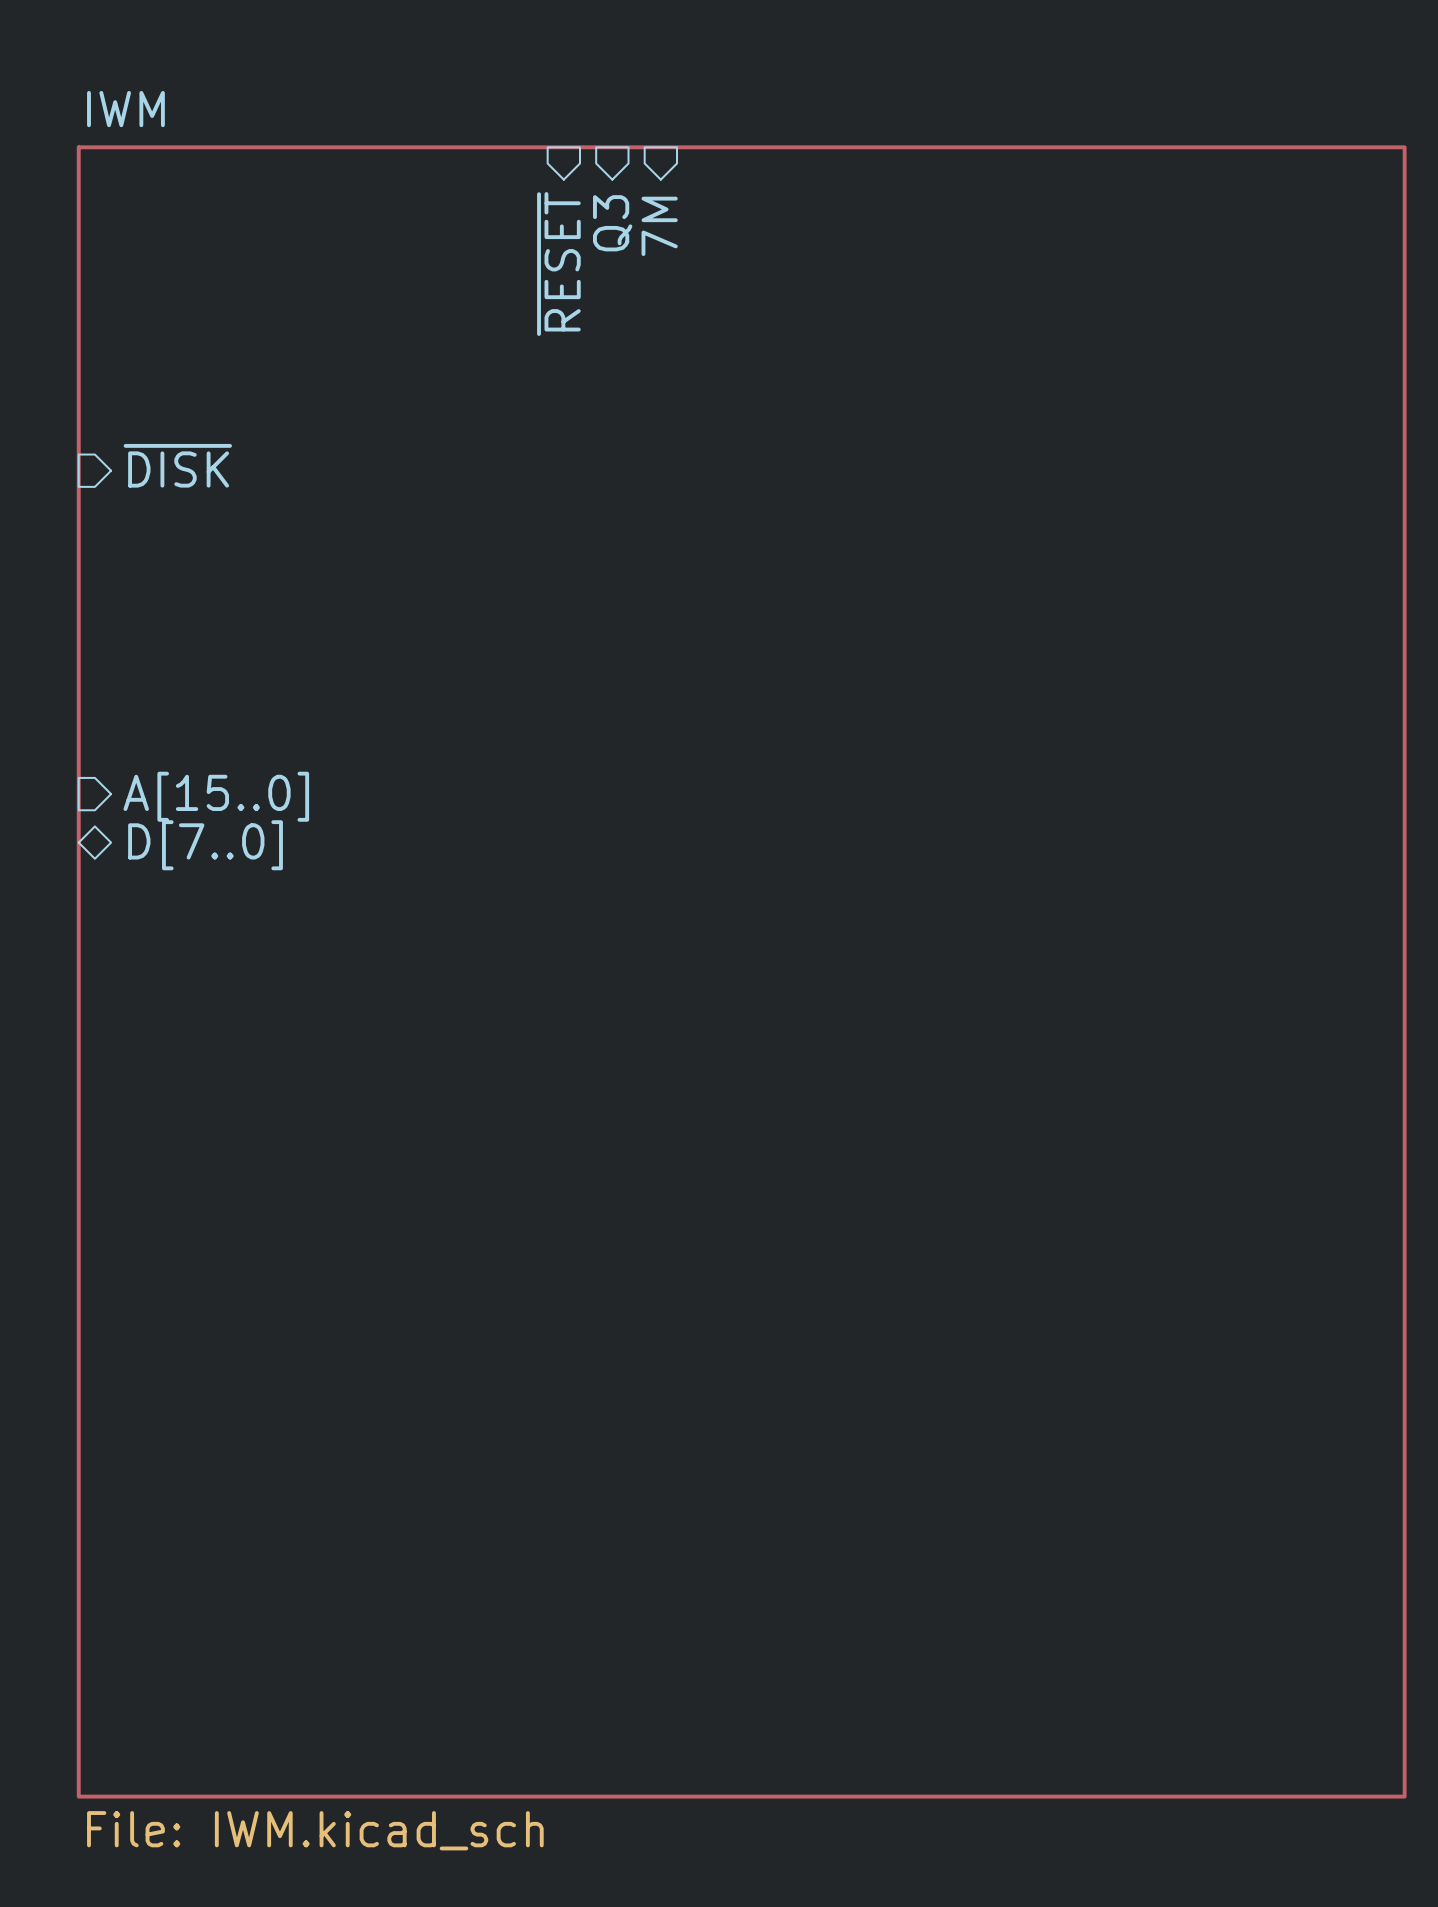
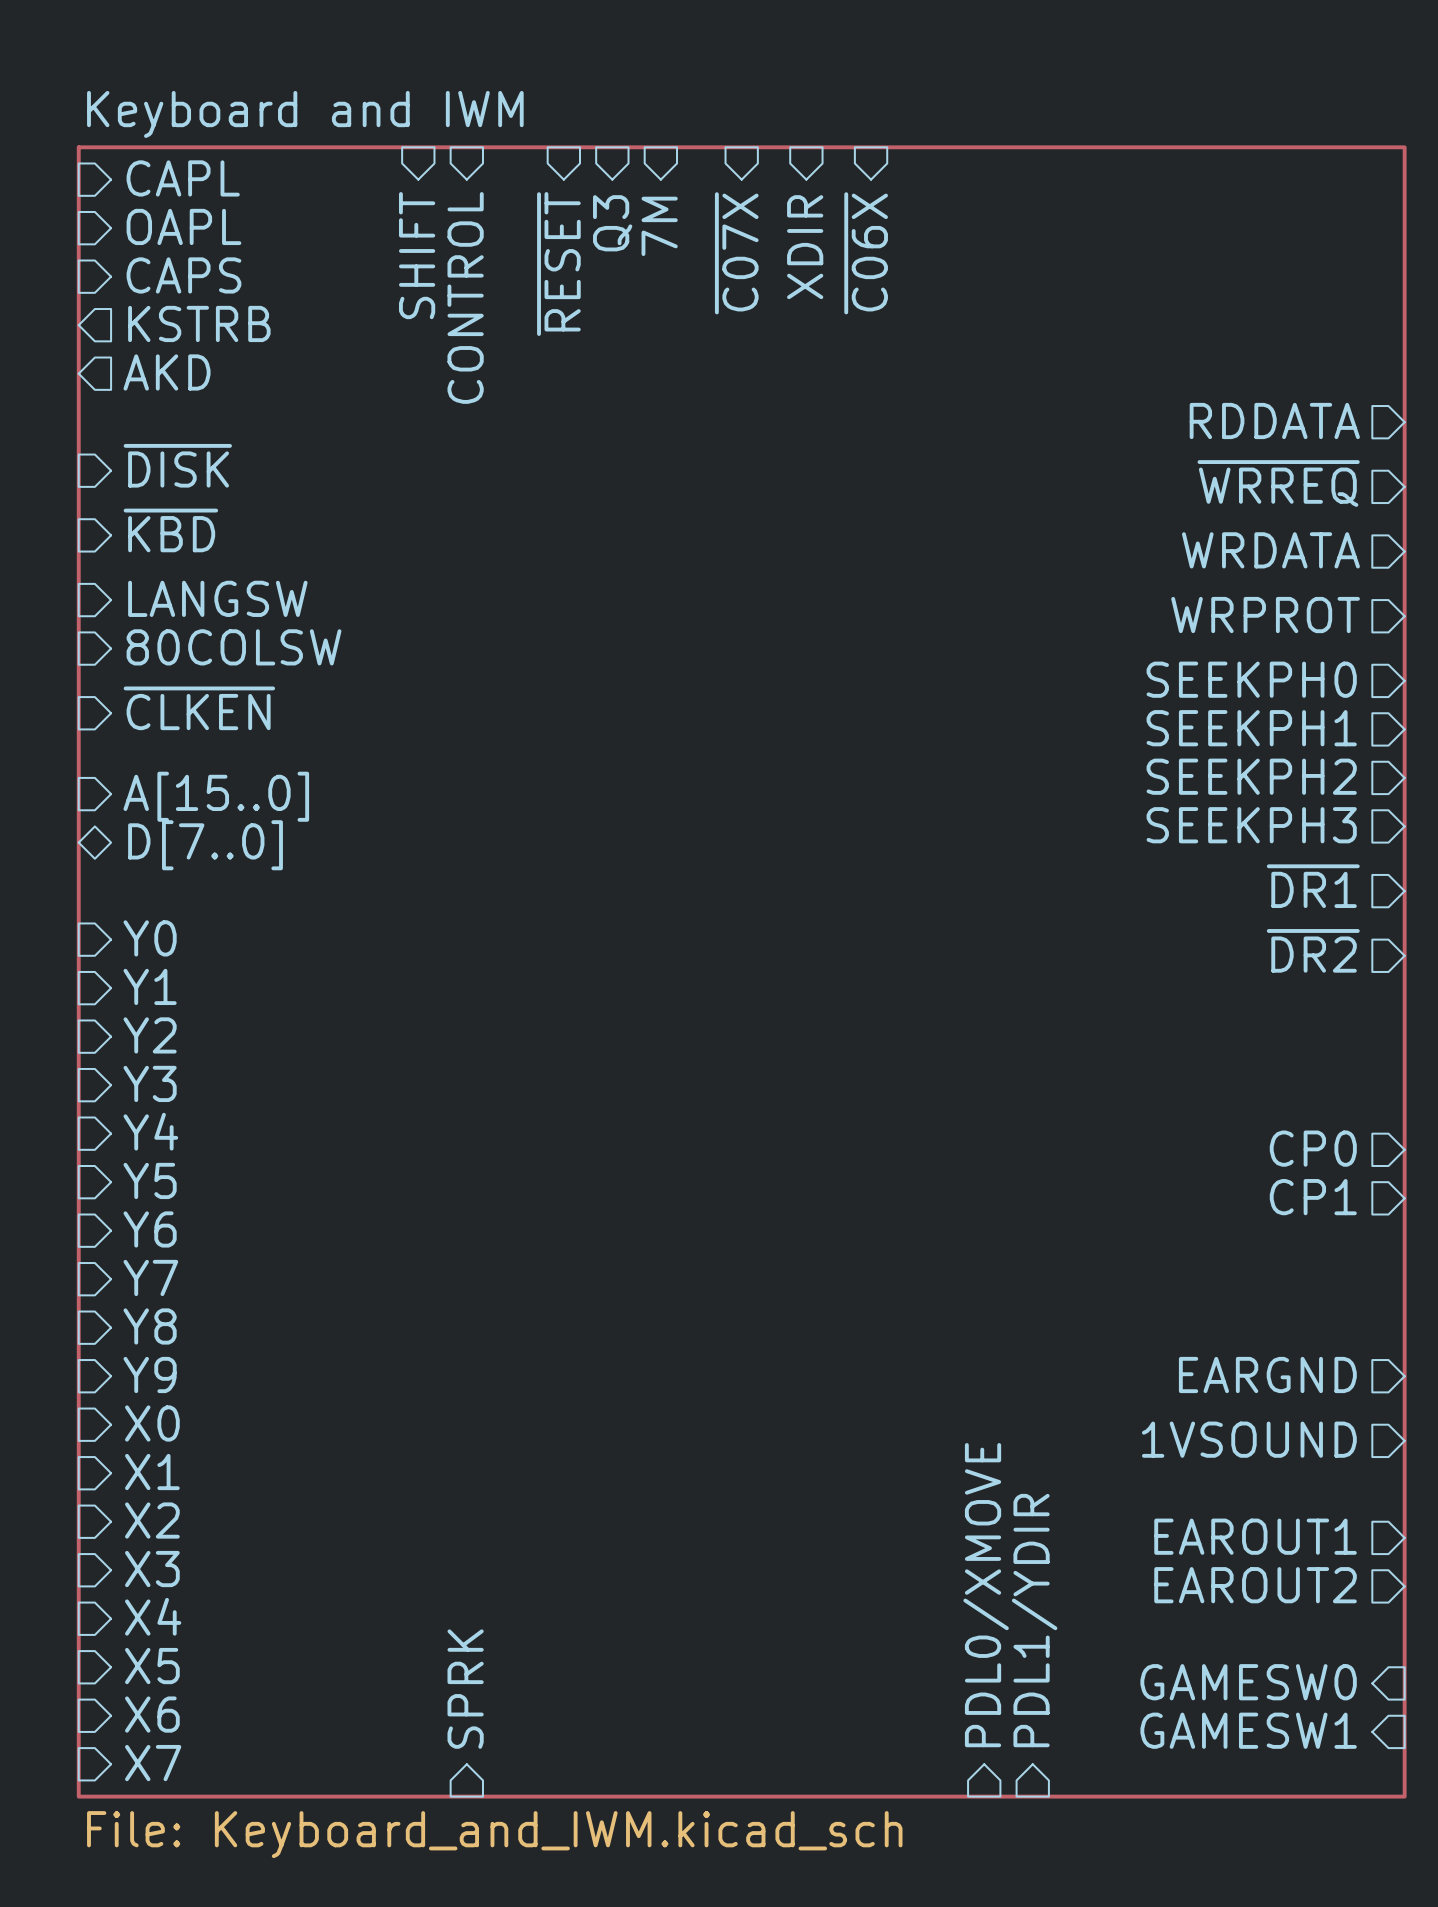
sheet IWM name: IWM (125, 109) -> Keyboard and IWM (305, 114)
sheet pin: none -> CAPL (183, 178)
sheet pin: none -> OAPL (183, 226)
sheet pin: none -> XDIR (805, 247)
sheet pin: none -> ~{C07X} (736, 253)
sheet pin: none -> ~{C06X} (866, 253)
sheet pin: none -> SHIFT (417, 255)
sheet pin: none -> CAPS (183, 275)
sheet pin: none -> CONTROL (465, 297)
sheet pin: none -> KSTRB (199, 323)
sheet pin: none -> AKD (167, 372)
sheet pin: none -> RDDATA (1274, 420)
sheet pin: none -> ~{WRREQ} (1278, 483)
sheet pin: none -> ~{KBD} (170, 530)
sheet pin: none -> WRDATA (1270, 550)
sheet pin: none -> LANGSW (217, 598)
sheet pin: none -> WRPROT (1265, 615)
sheet pin: none -> 80COLSW (234, 647)
sheet pin: none -> SEEKPH0 (1251, 679)
sheet pin: none -> ~{CLKEN} (199, 708)
sheet pin: none -> SEEKPH1 (1251, 728)
sheet pin: none -> SEEKPH2 (1251, 776)
sheet pin: none -> SEEKPH3 (1251, 825)
sheet pin: none -> ~{DR1} (1313, 886)
sheet pin: none -> Y0 (150, 938)
sheet pin: none -> ~{DR2} (1313, 950)
sheet pin: none -> Y1 (150, 986)
sheet pin: none -> Y2 (150, 1035)
sheet pin: none -> Y3 (150, 1083)
sheet pin: none -> Y4 (150, 1131)
sheet pin: none -> CP0 (1313, 1148)
sheet pin: none -> Y5 (150, 1180)
sheet pin: none -> CP1 (1313, 1197)
sheet pin: none -> Y6 (150, 1229)
sheet pin: none -> Y7 (150, 1277)
sheet pin: none -> Y8 (150, 1326)
sheet pin: none -> Y9 (150, 1374)
sheet pin: none -> EARGND (1267, 1374)
sheet pin: none -> X0 (152, 1423)
sheet pin: none -> 1VSOUND (1249, 1439)
sheet pin: none -> X1 (152, 1472)
sheet pin: none -> X2 (152, 1520)
sheet pin: none -> EAROUT1 (1255, 1536)
sheet pin: none -> X3 (152, 1569)
sheet pin: none -> EAROUT2 (1255, 1585)
sheet pin: none -> PDL0/XMOVE (986, 1595)
sheet pin: none -> X4 (153, 1616)
sheet pin: none -> PDL1/YDIR (1034, 1620)
sheet pin: none -> X5 (152, 1666)
sheet pin: none -> GAMESW0 (1248, 1682)
sheet pin: none -> SPRK (465, 1689)
sheet pin: none -> X6 (152, 1714)
sheet pin: none -> GAMESW1 (1248, 1730)
sheet pin: none -> X7 (153, 1763)
sheet IWM value: File: IWM.kicad_sch (315, 1830) -> File: Keyboard_and_IWM.kicad_sch (494, 1834)

